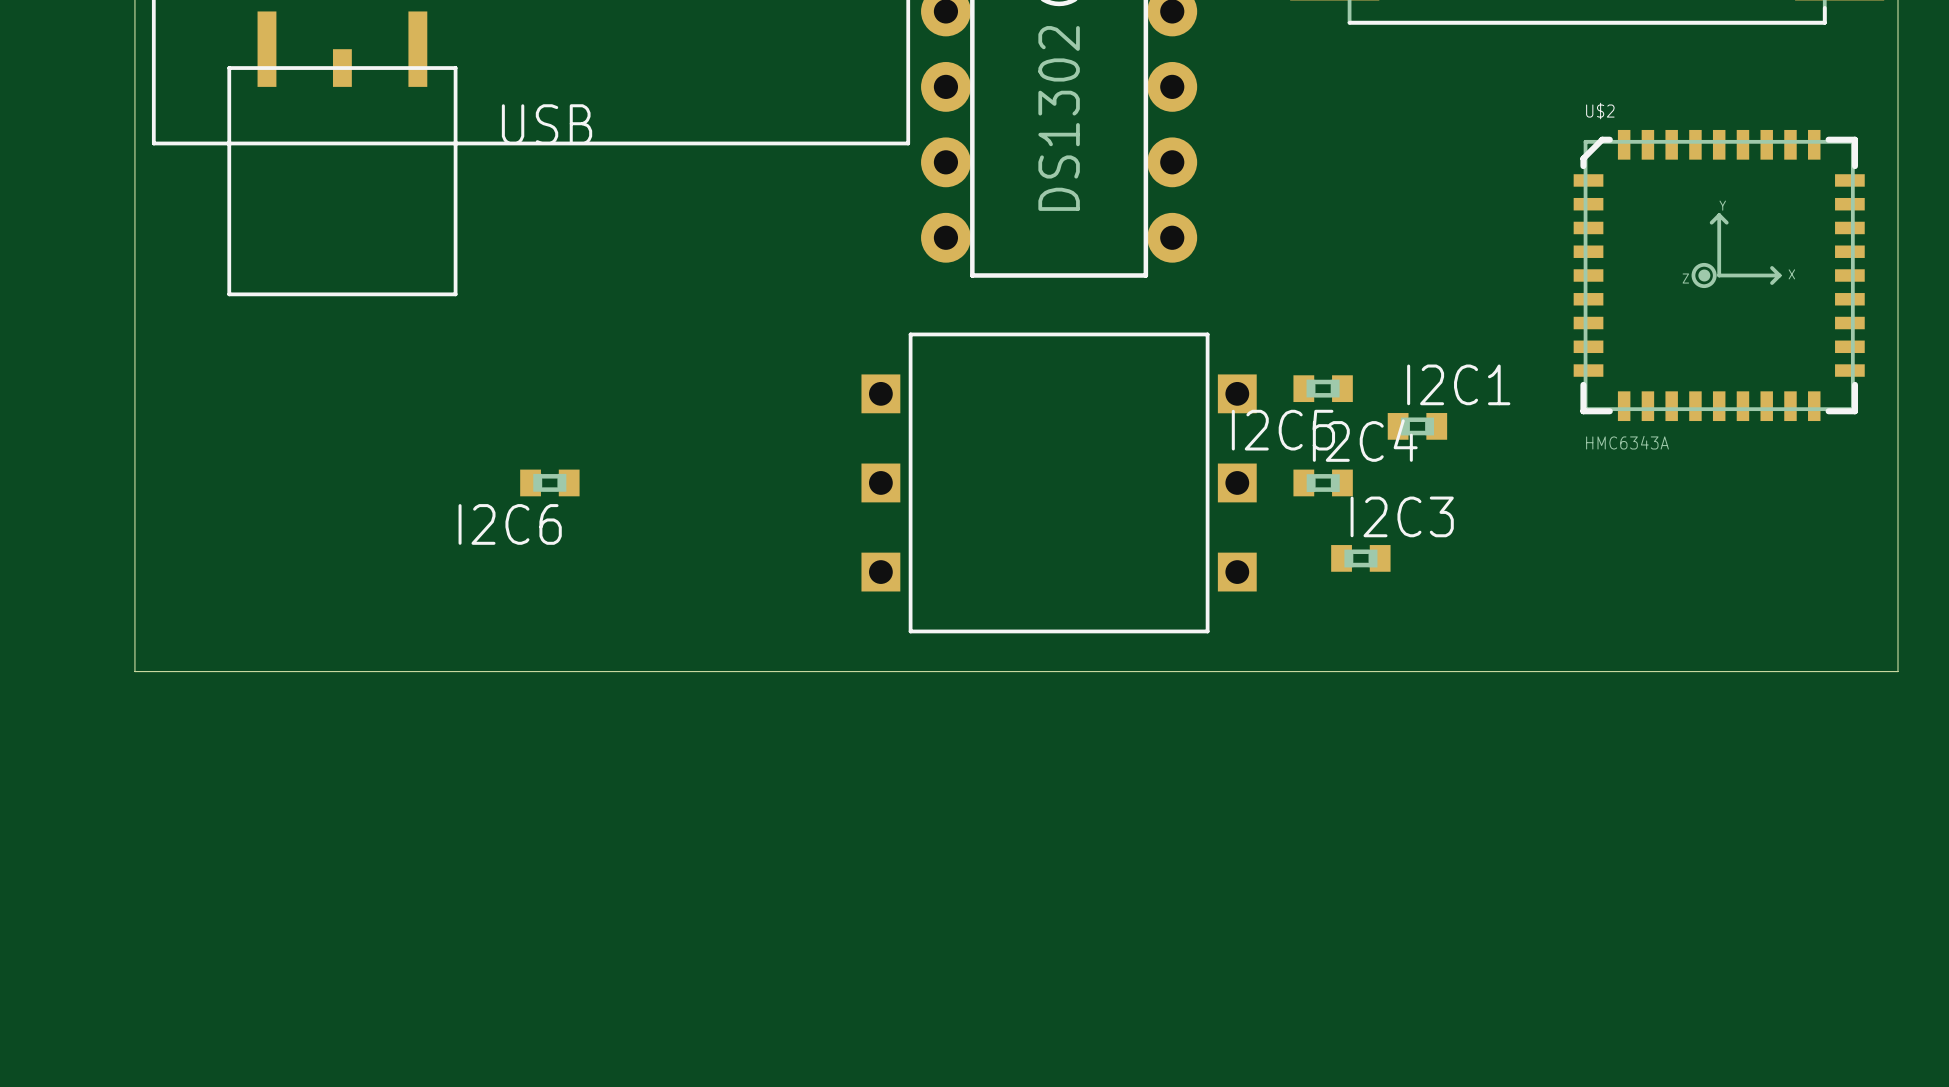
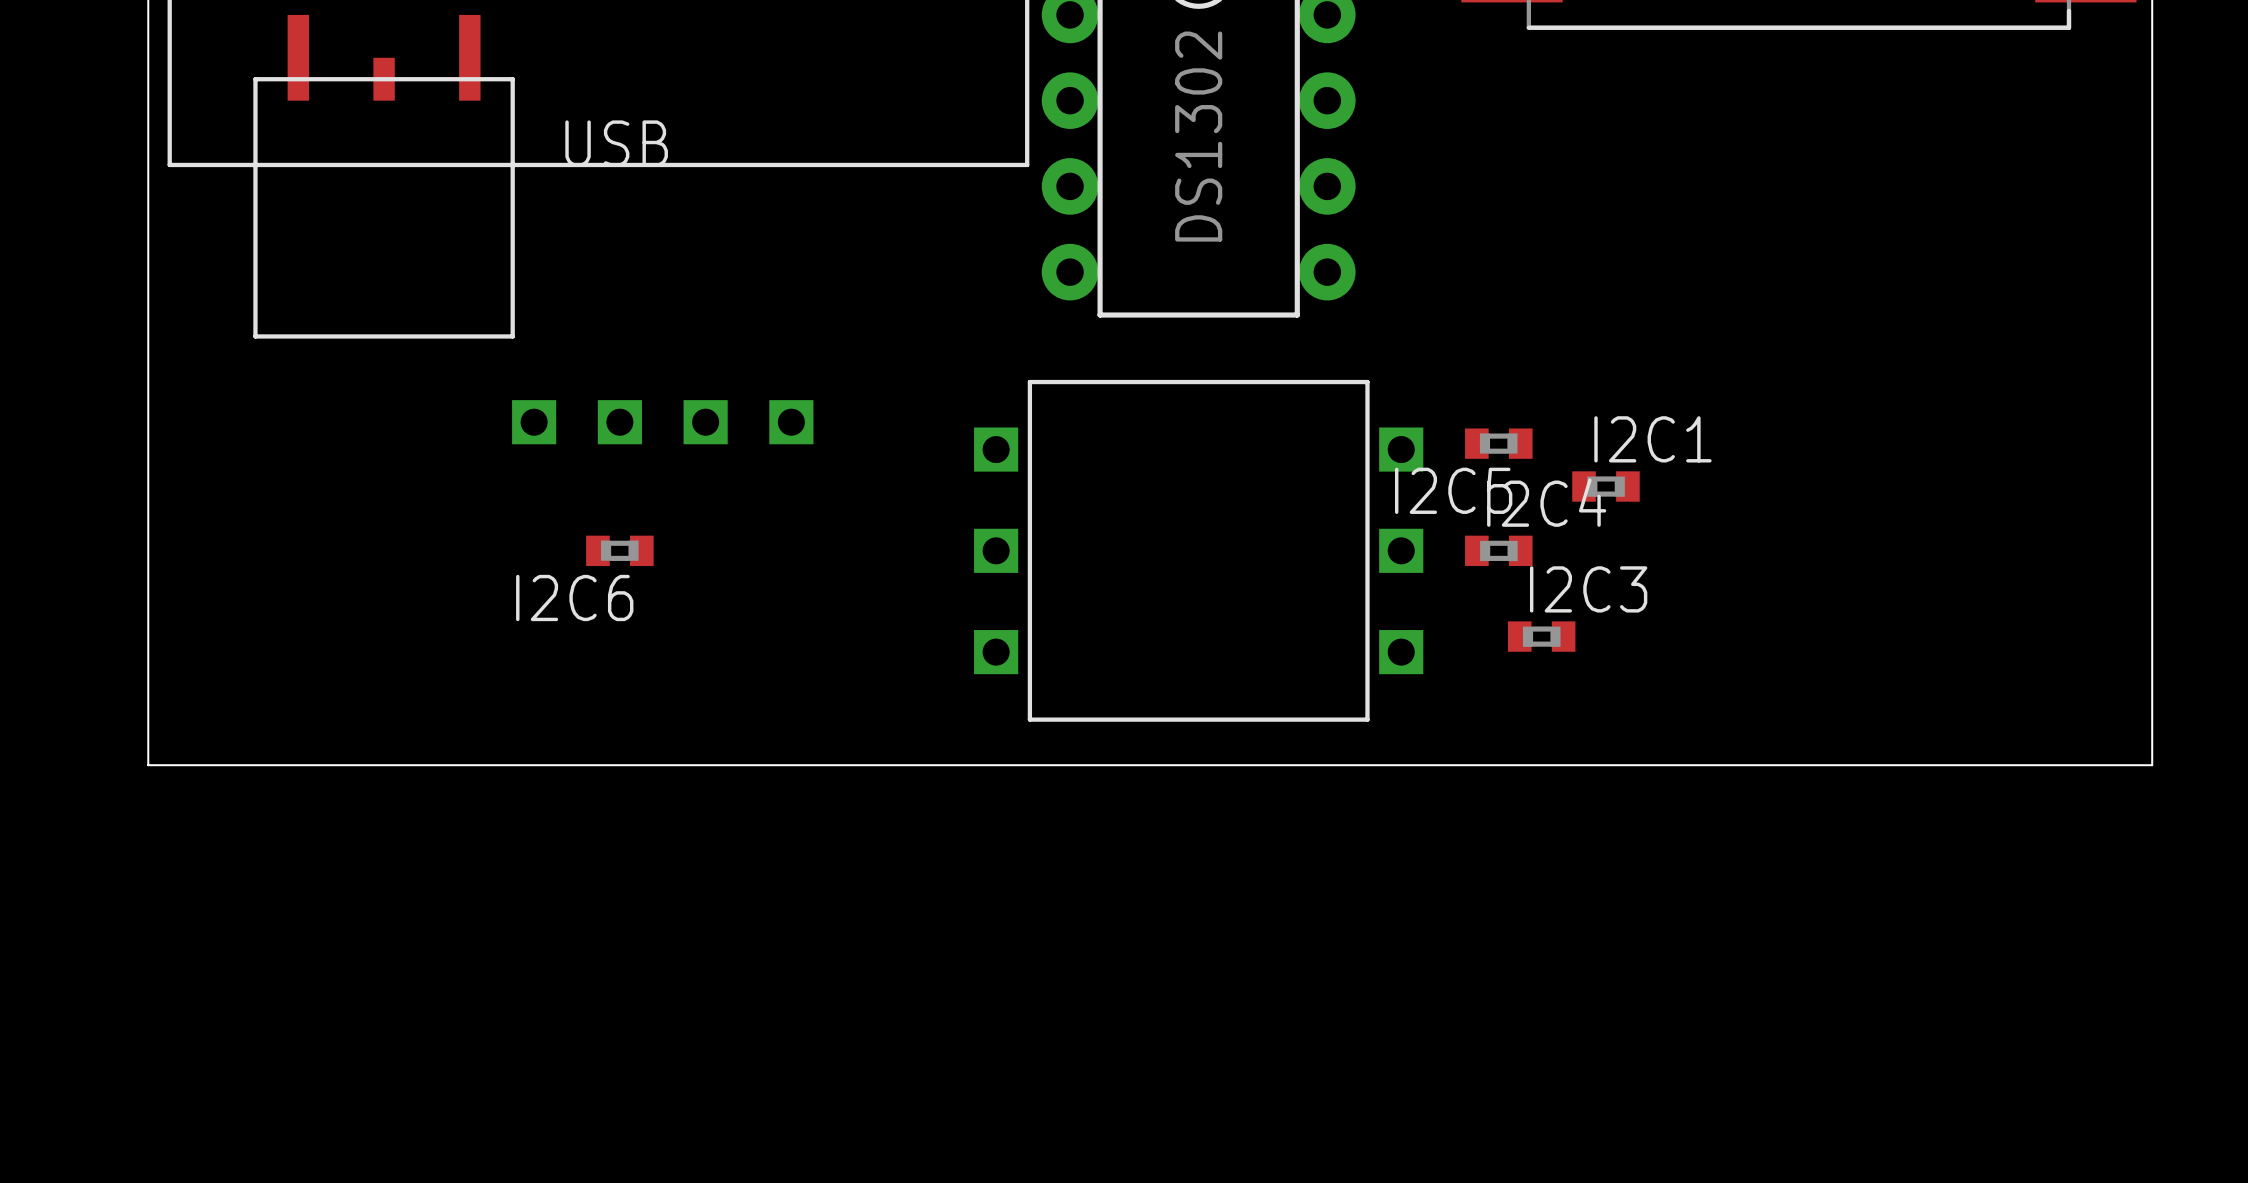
U$2: HMC6343A (1719, 275) -> none
part: none -> (662, 422)

